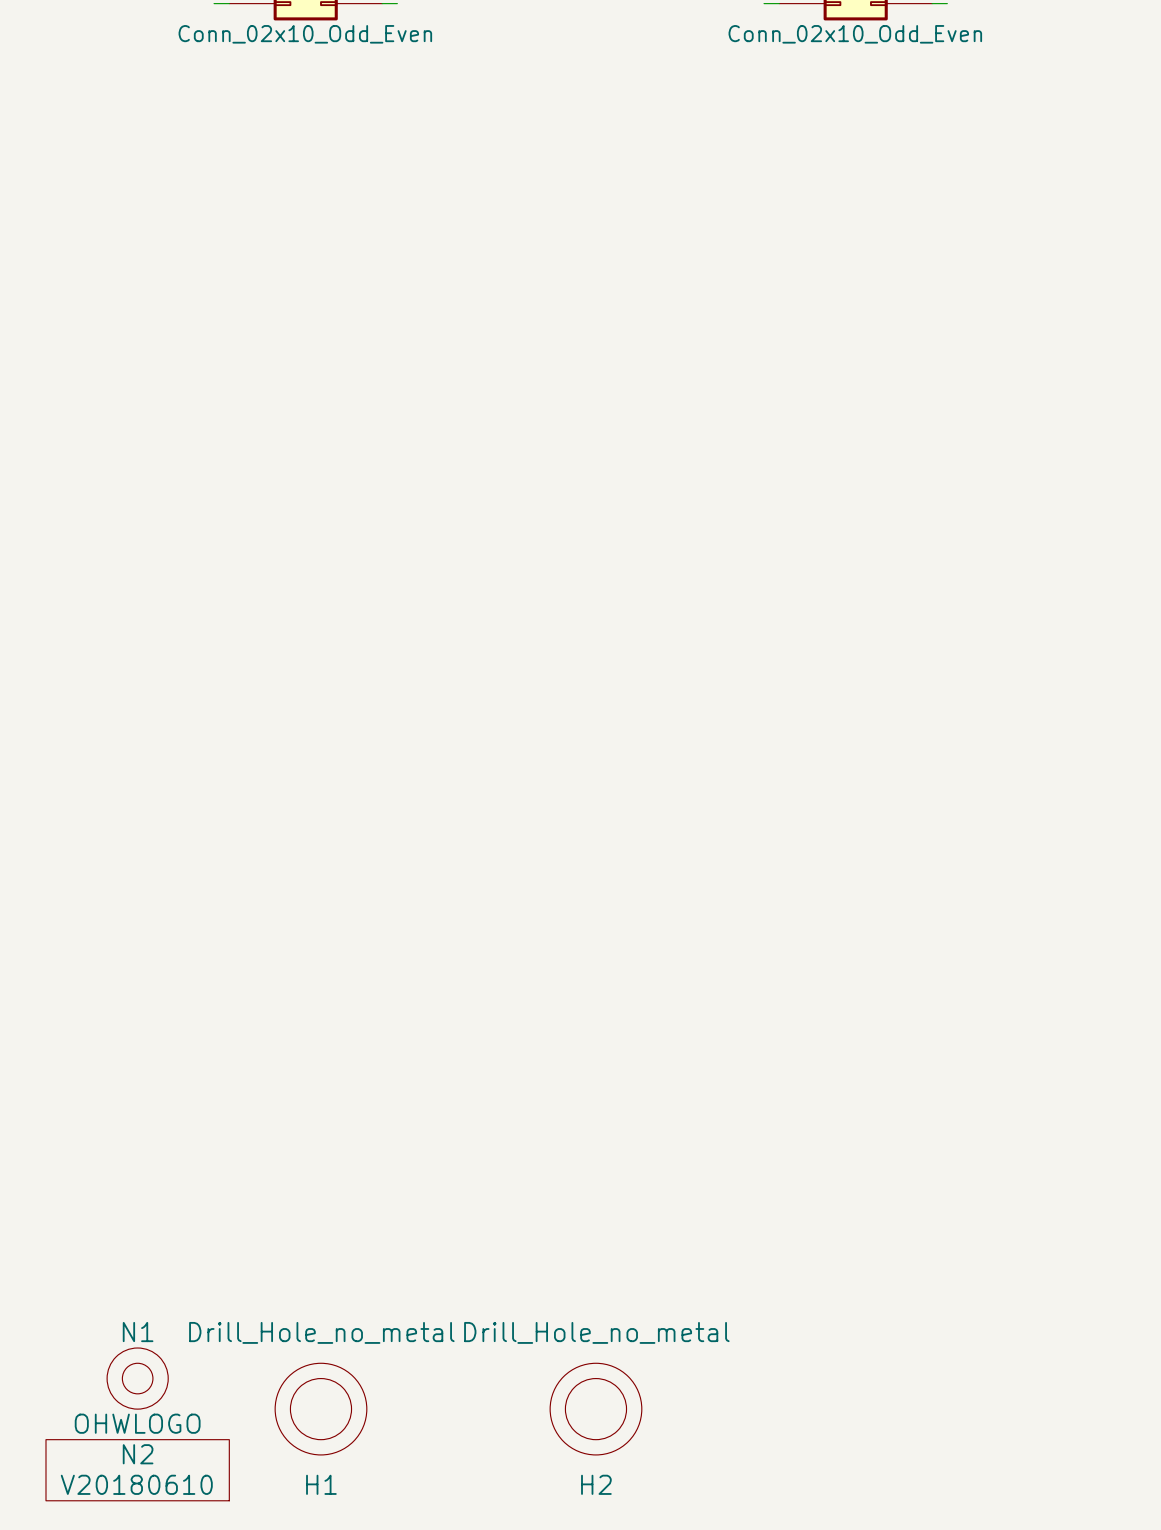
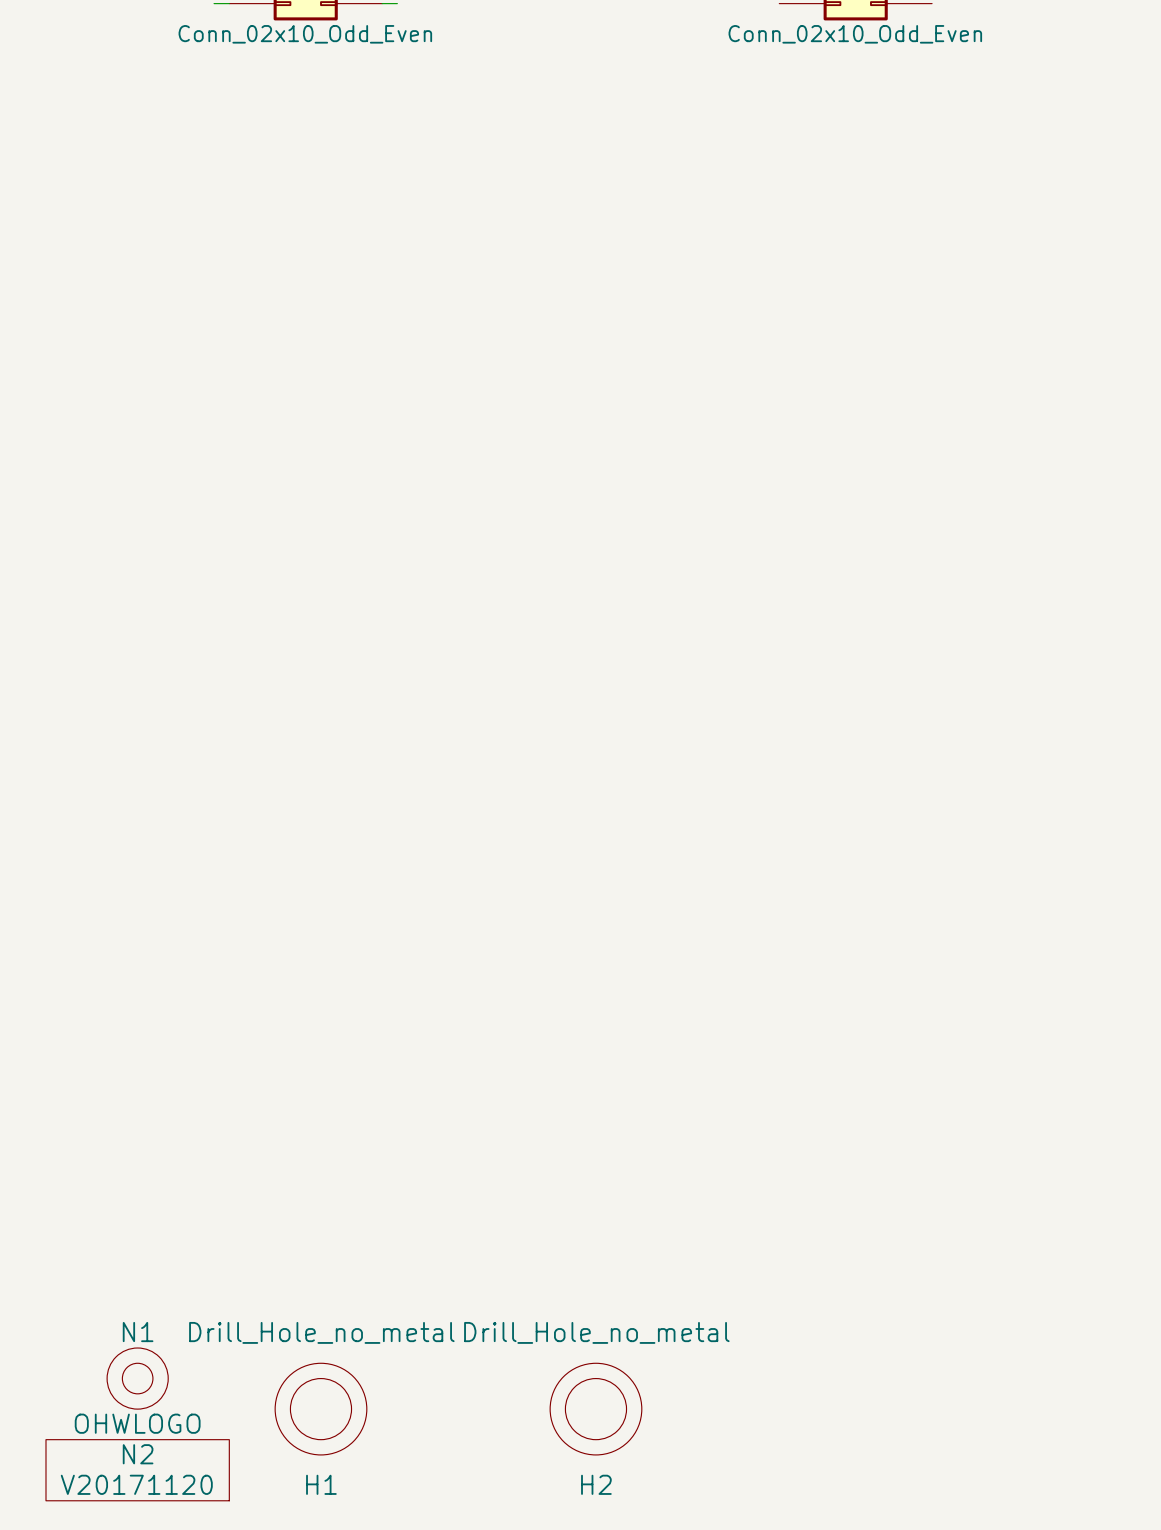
wire: (764, 3) (779, 3) -> none
wire: (932, 3) (947, 3) -> none
N2 value: V20180610 (136, 1484) -> V20171120 (136, 1484)

